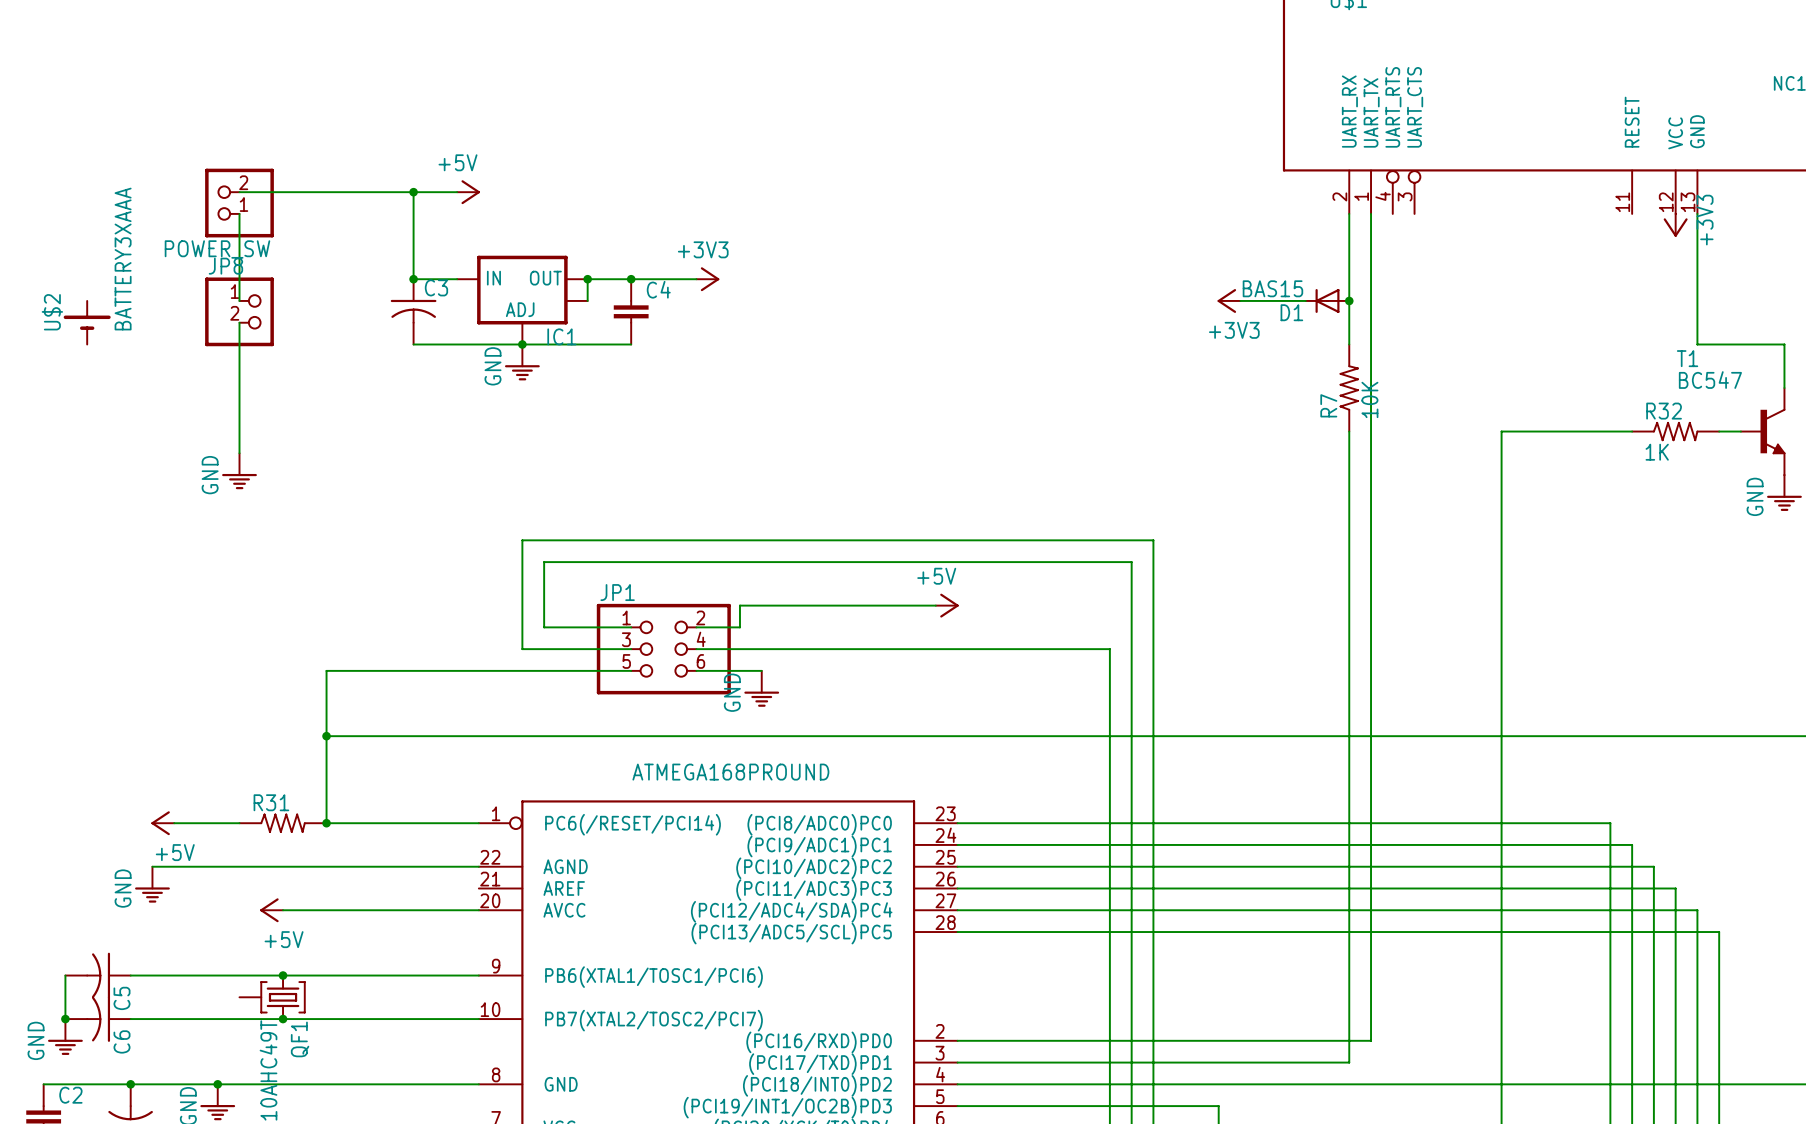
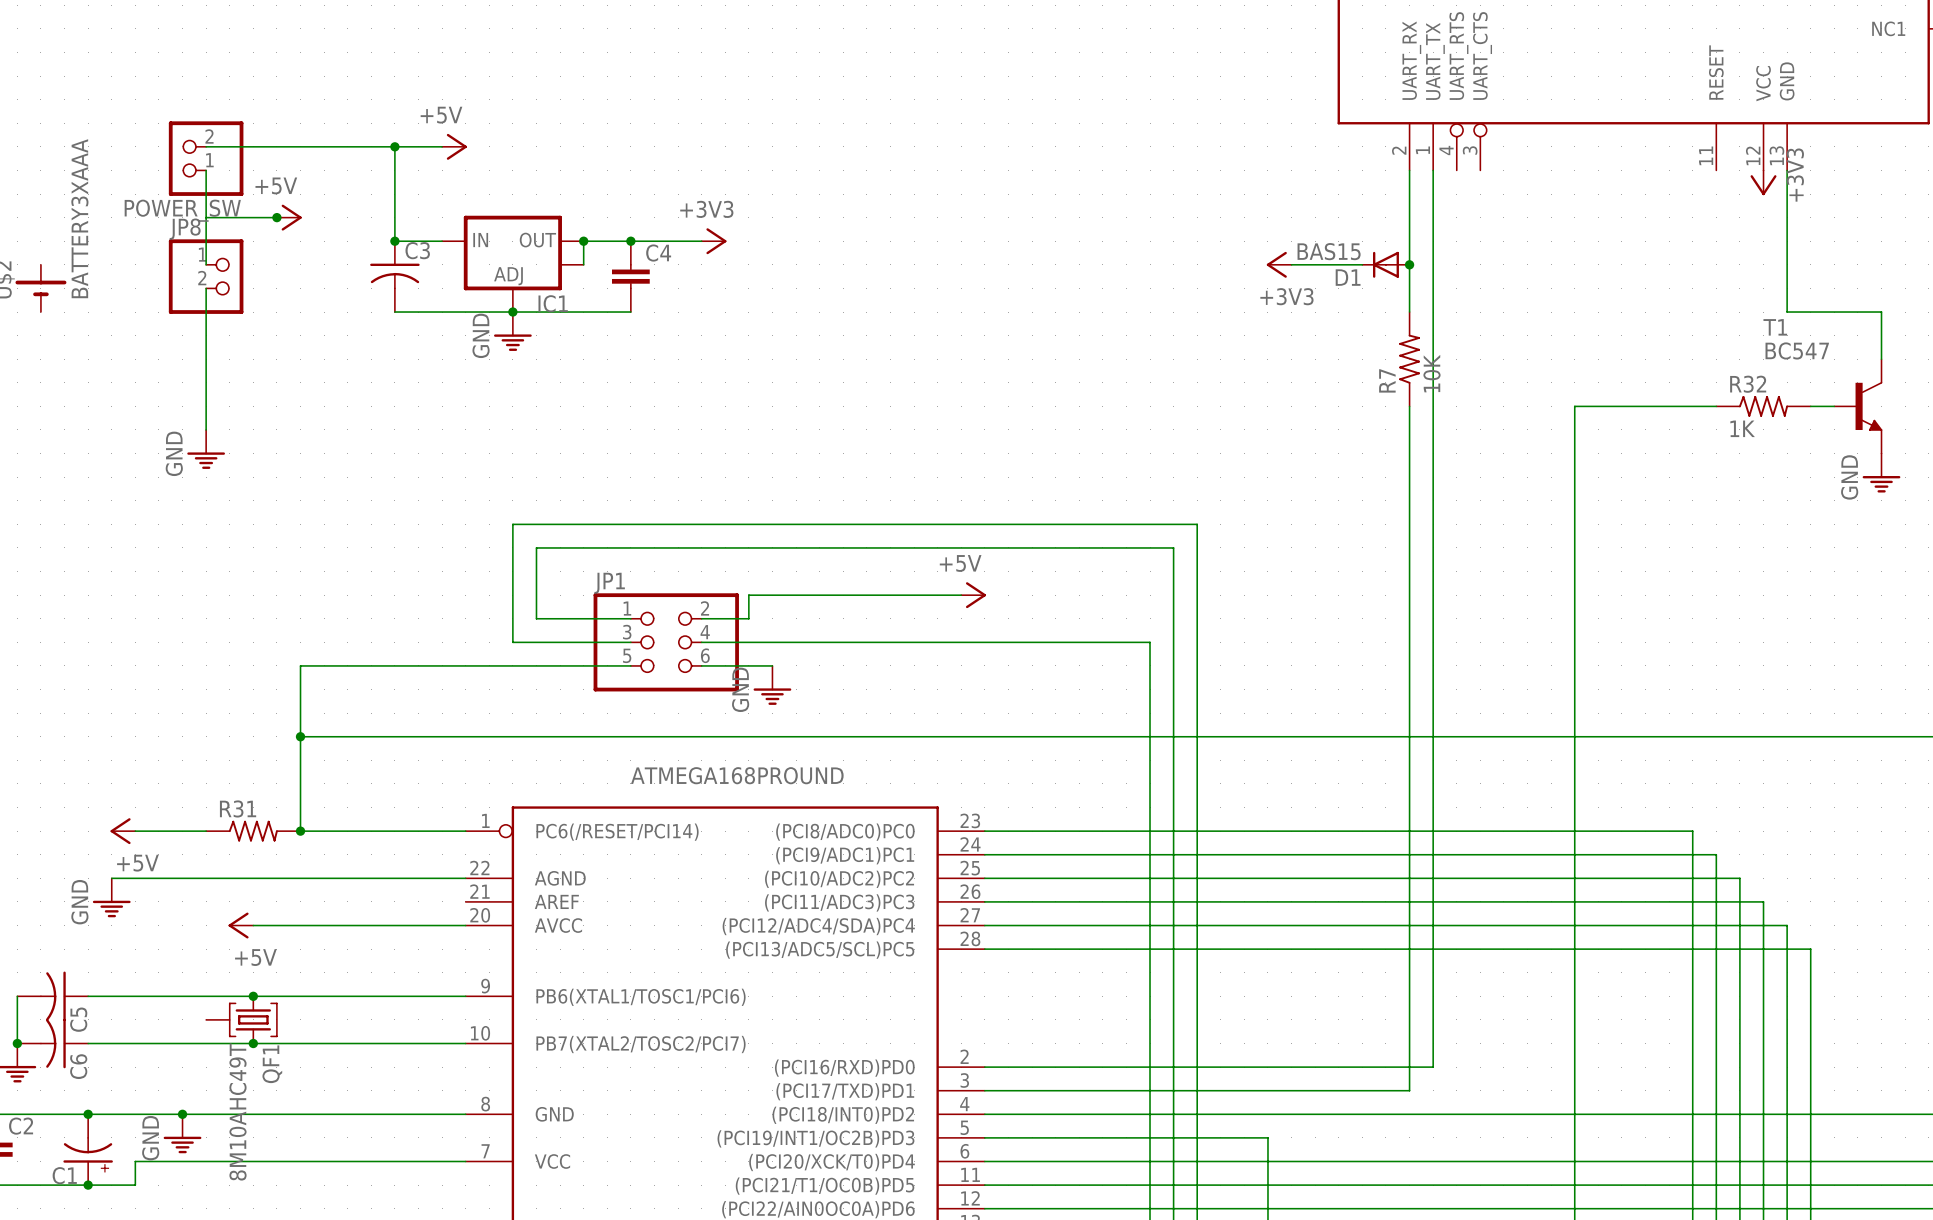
wire: none -> (206, 217) (276, 217)
junction: none -> (276, 217)
power symbol: none -> +5V (289, 217)

